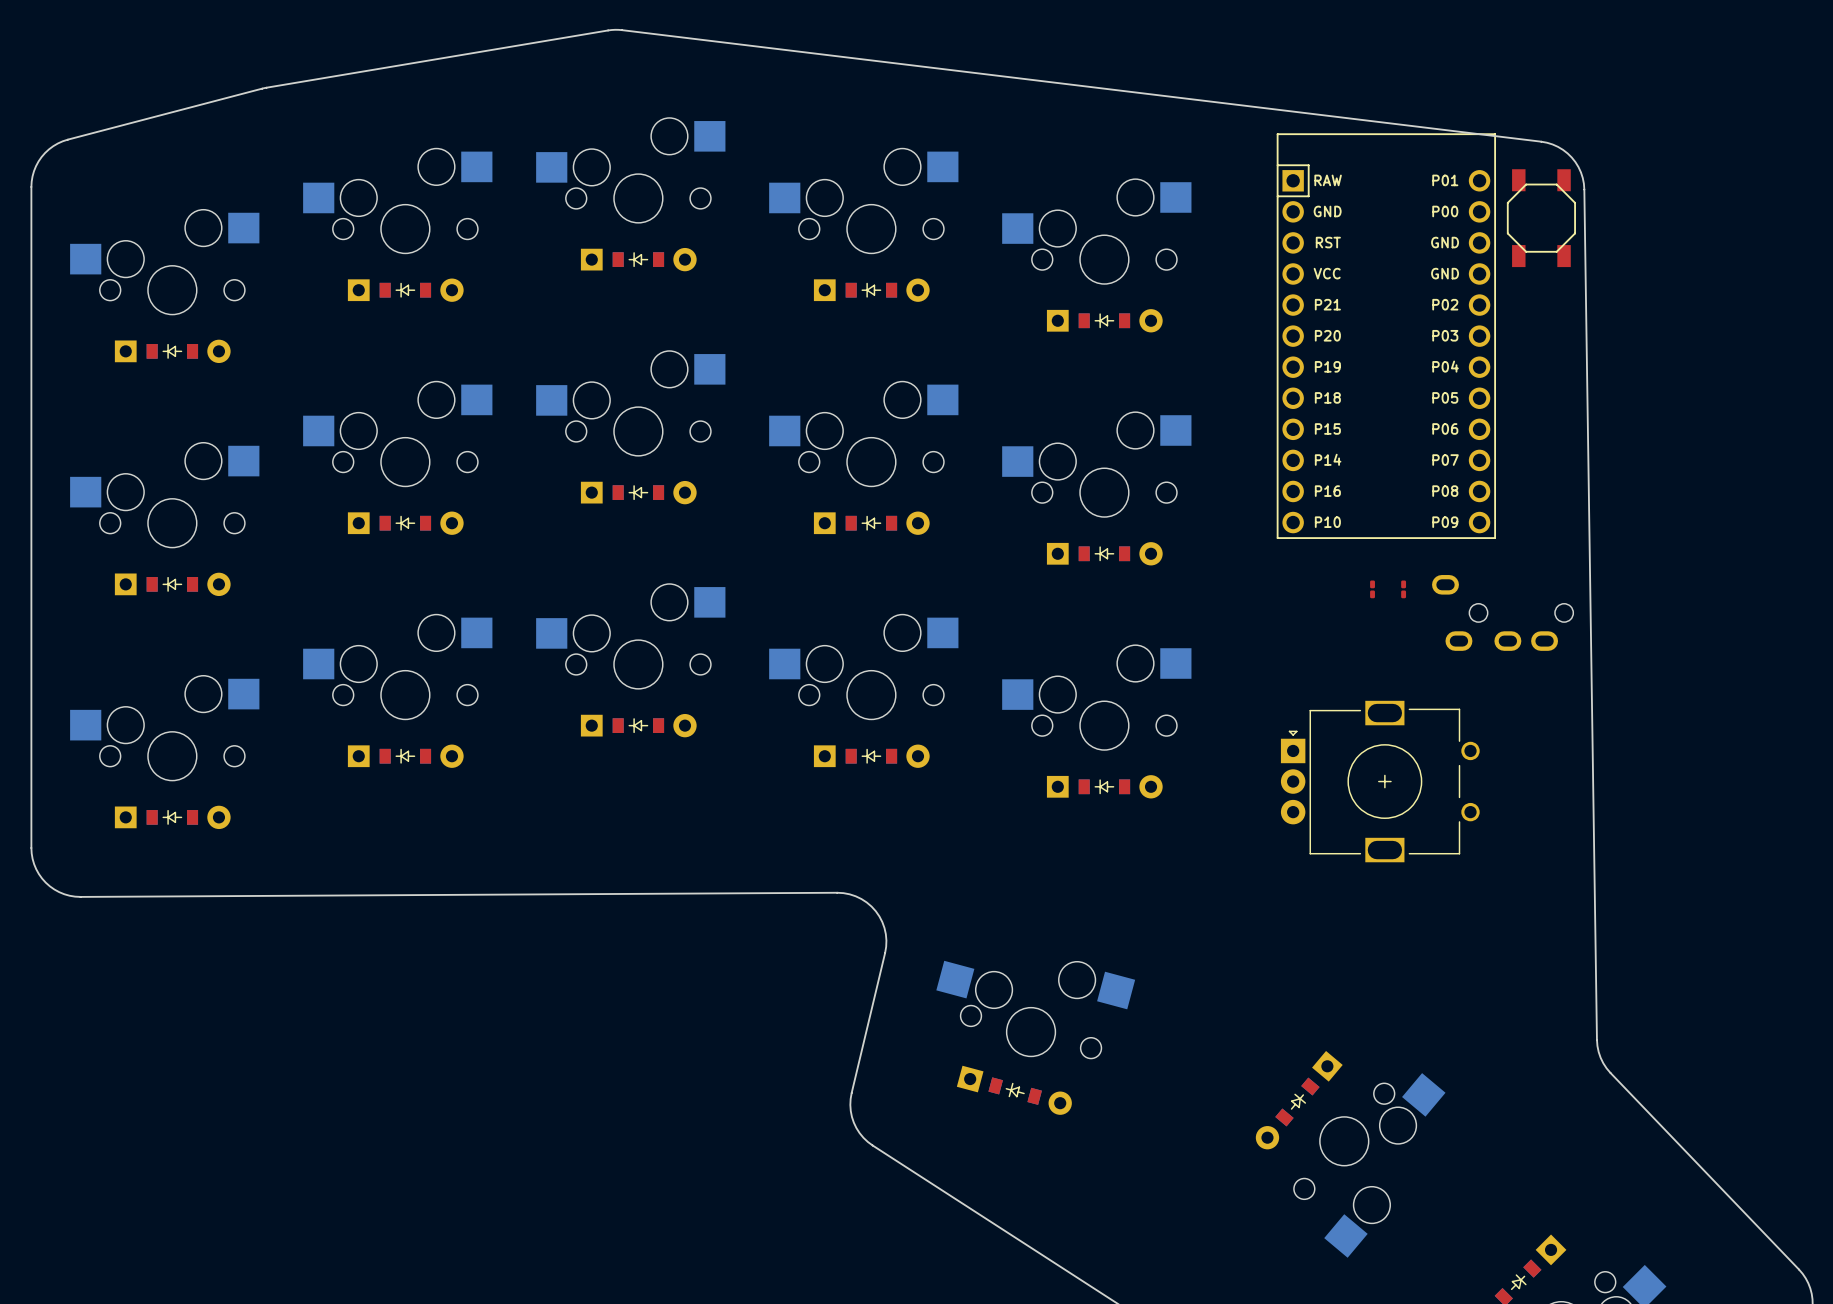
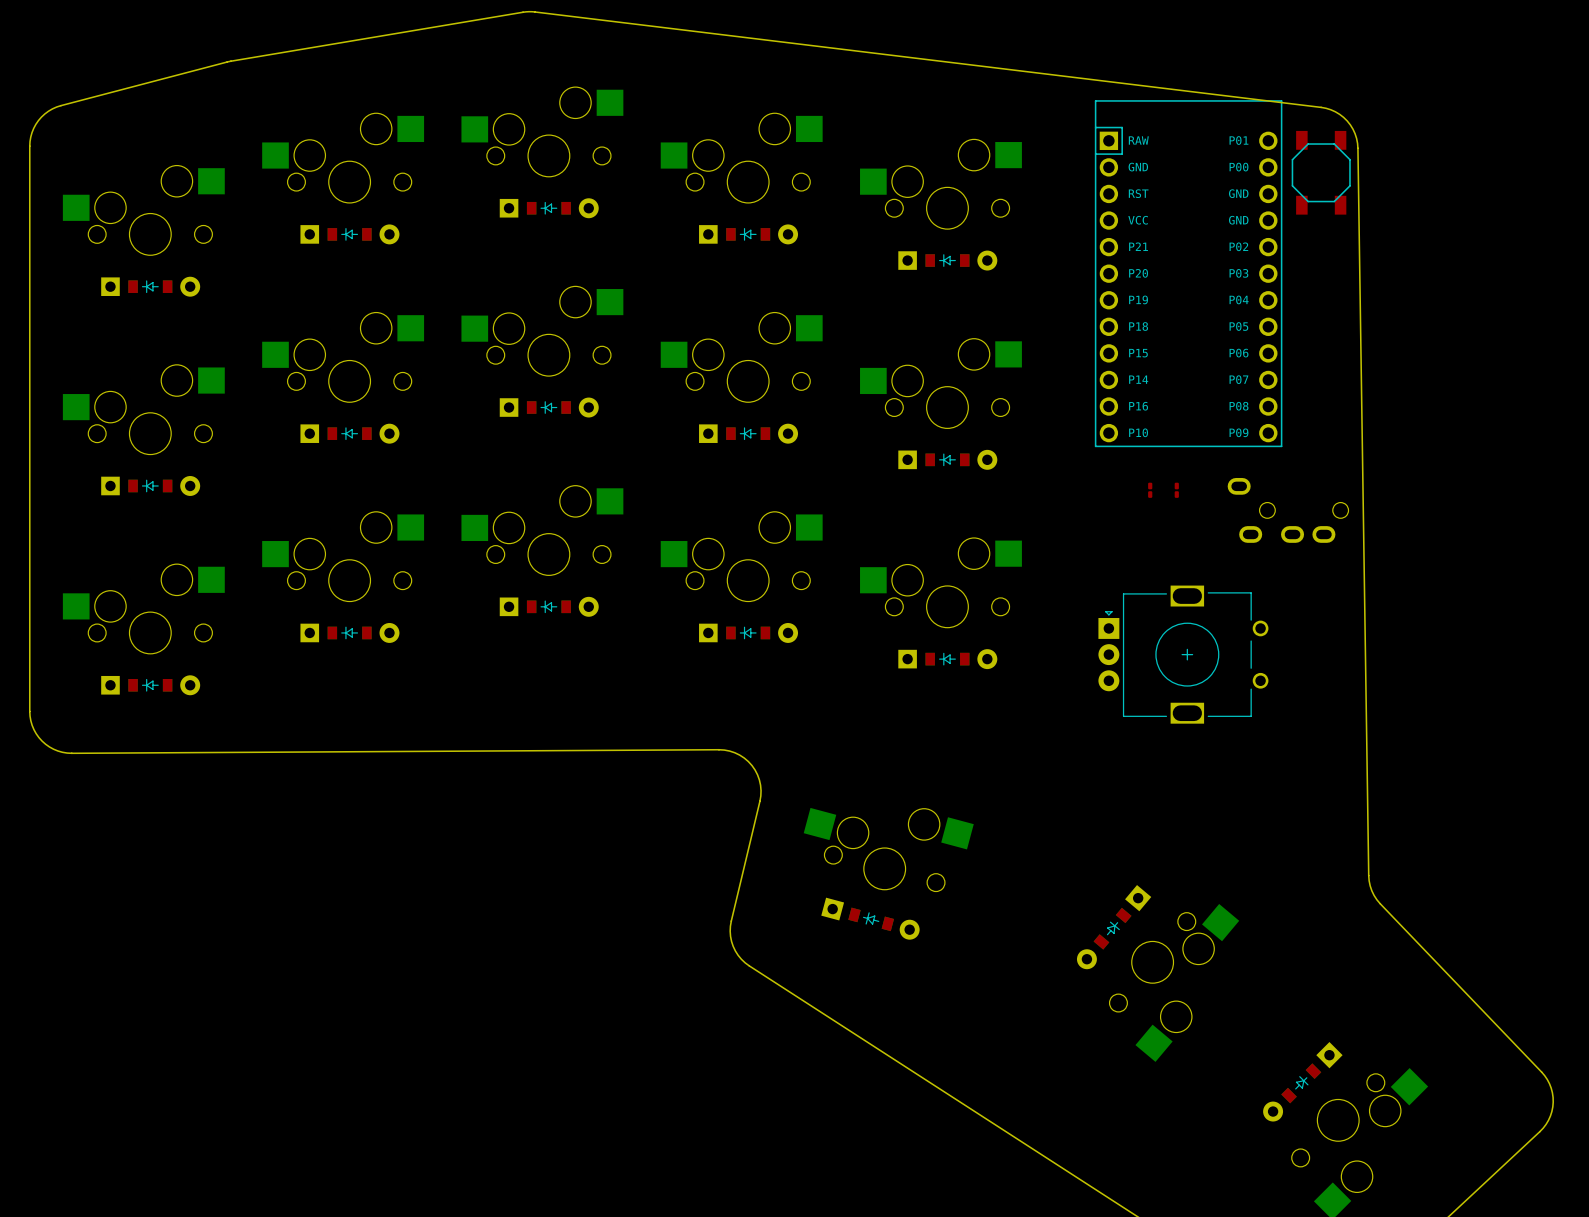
part position: (1403, 589) -> (1150, 490)

